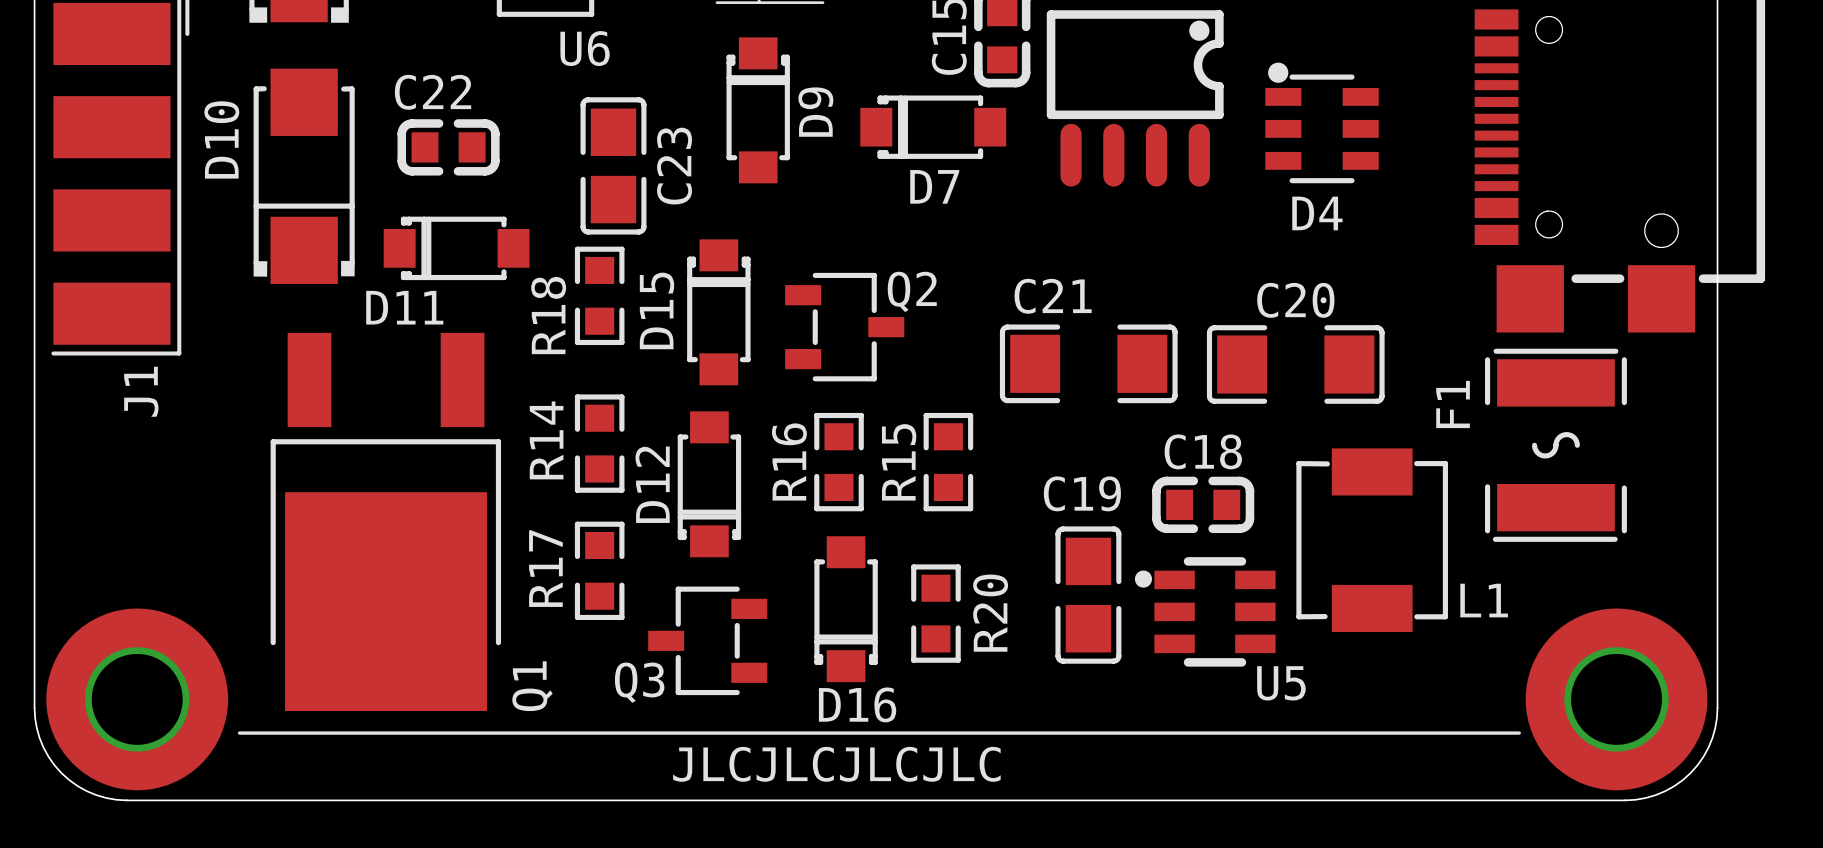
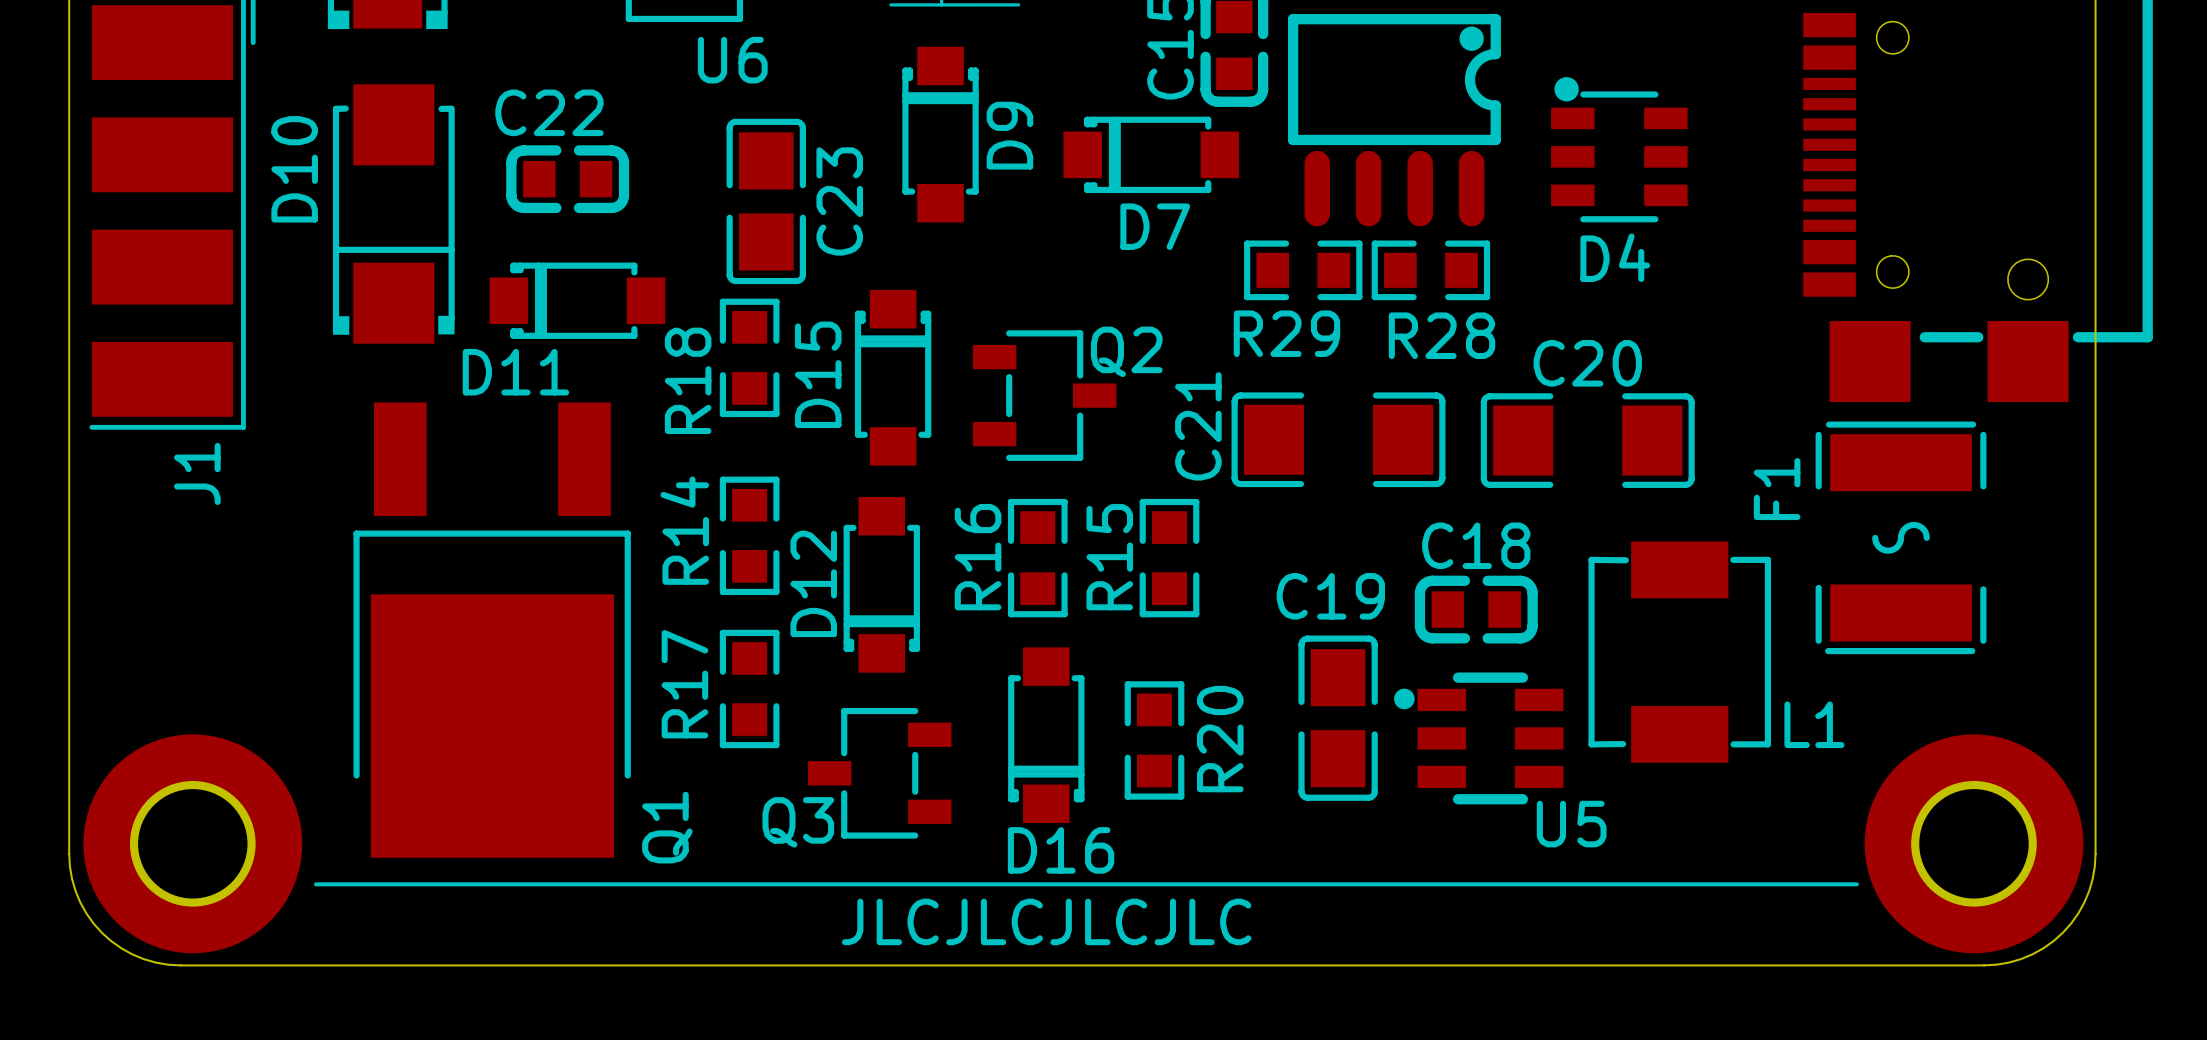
R29: none -> (1303, 270)
R28: none -> (1430, 270)
C21 name rotation: 0° (1053, 296) -> 90° counterclockwise (1198, 426)

